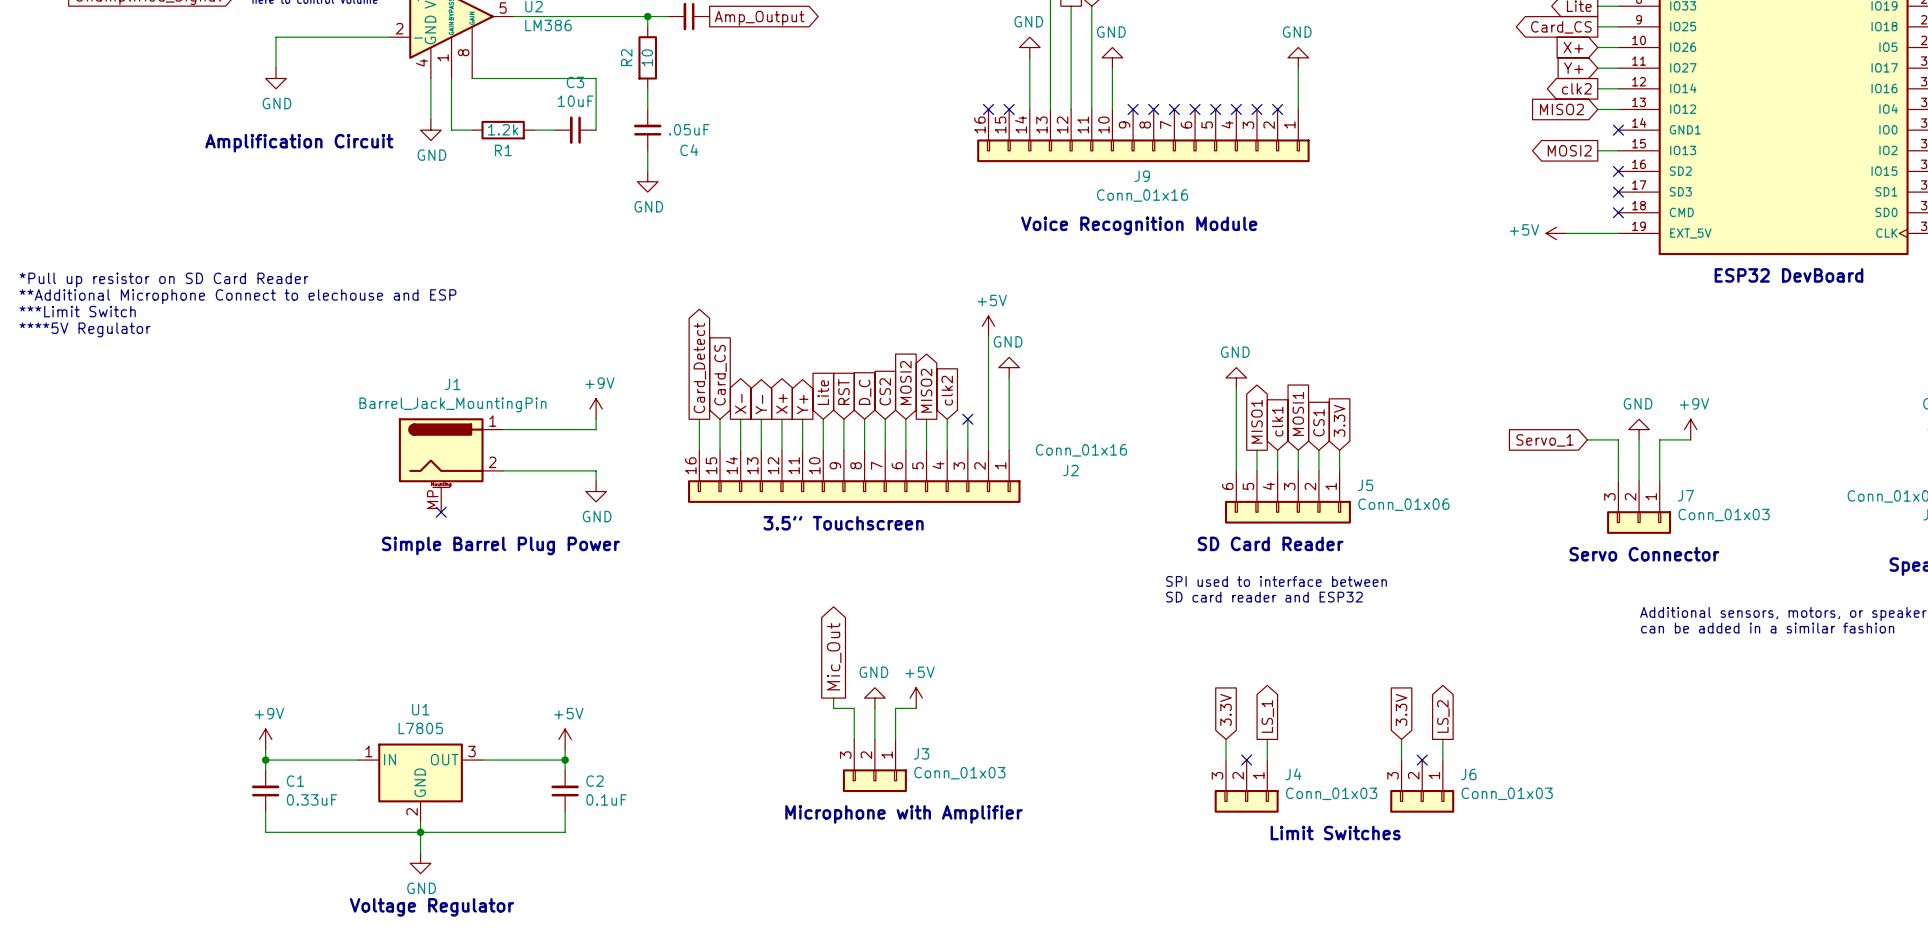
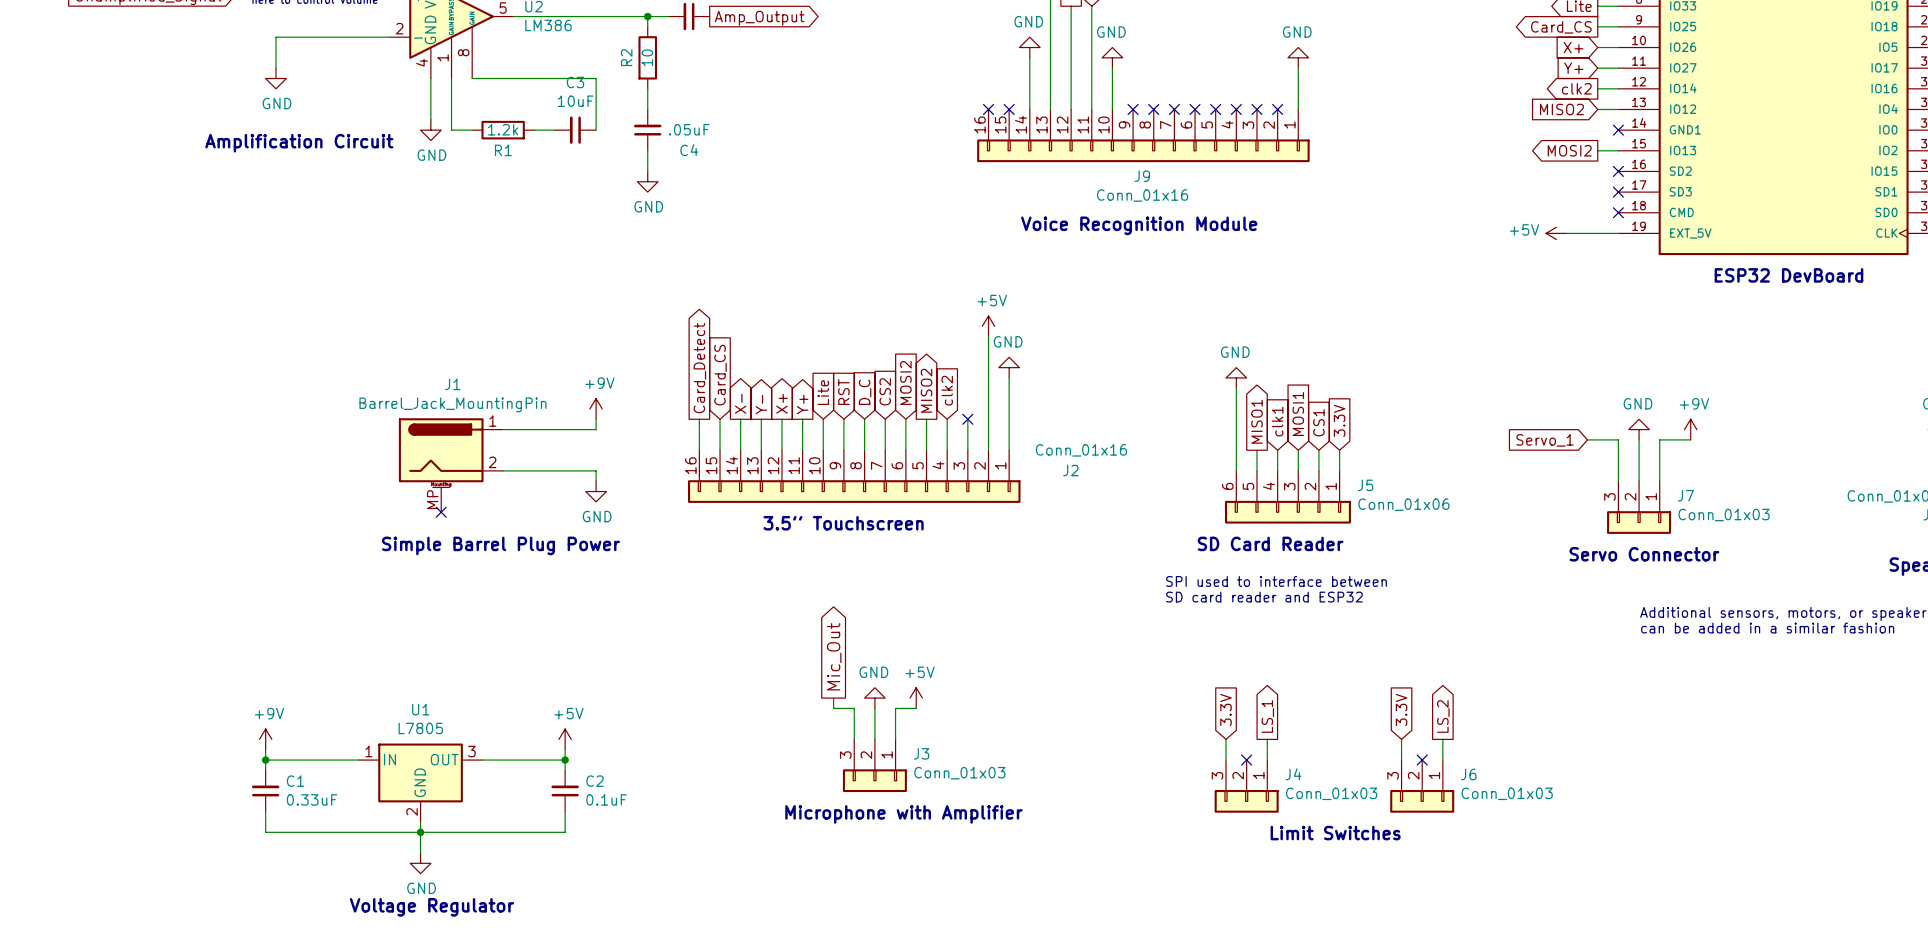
text: *Pull up resistor on SD Card Reader (163, 280) -> none
text: **Additional Microphone Connect to elechouse and ESP (237, 296) -> none
text: ***Limit Switch (77, 311) -> none
text: ****5V Regulator (85, 329) -> none

